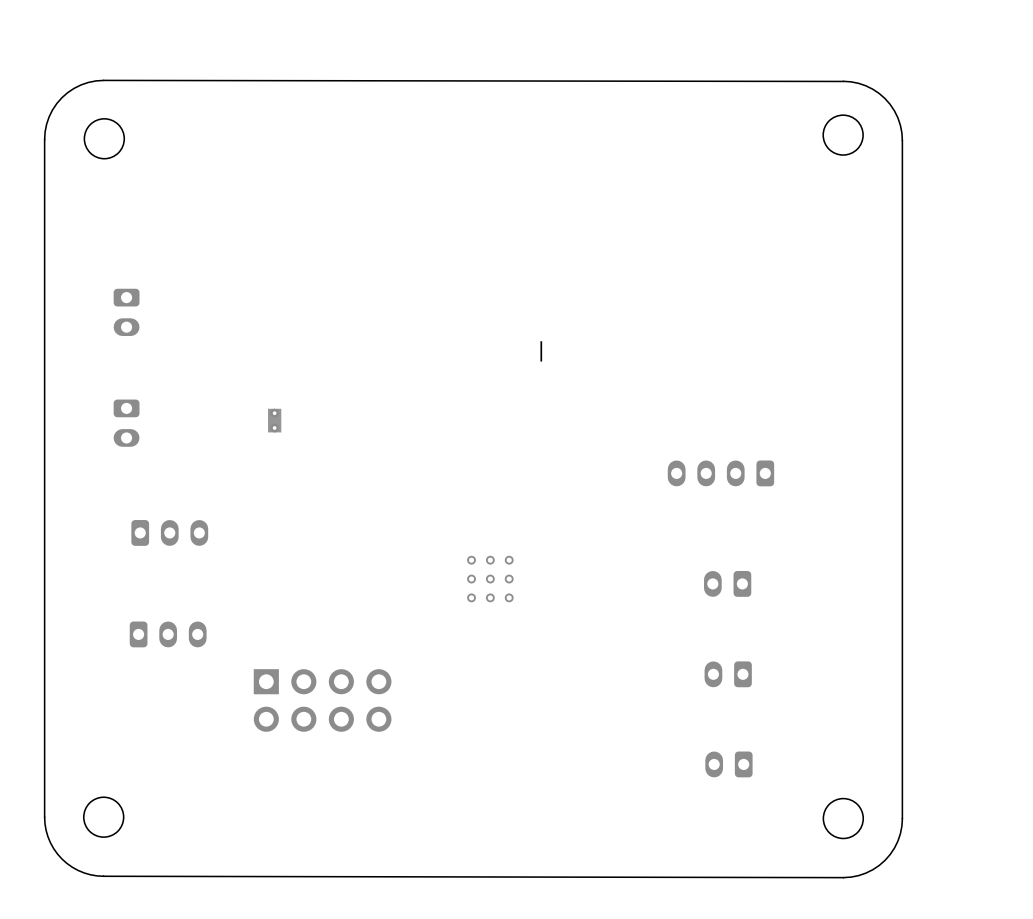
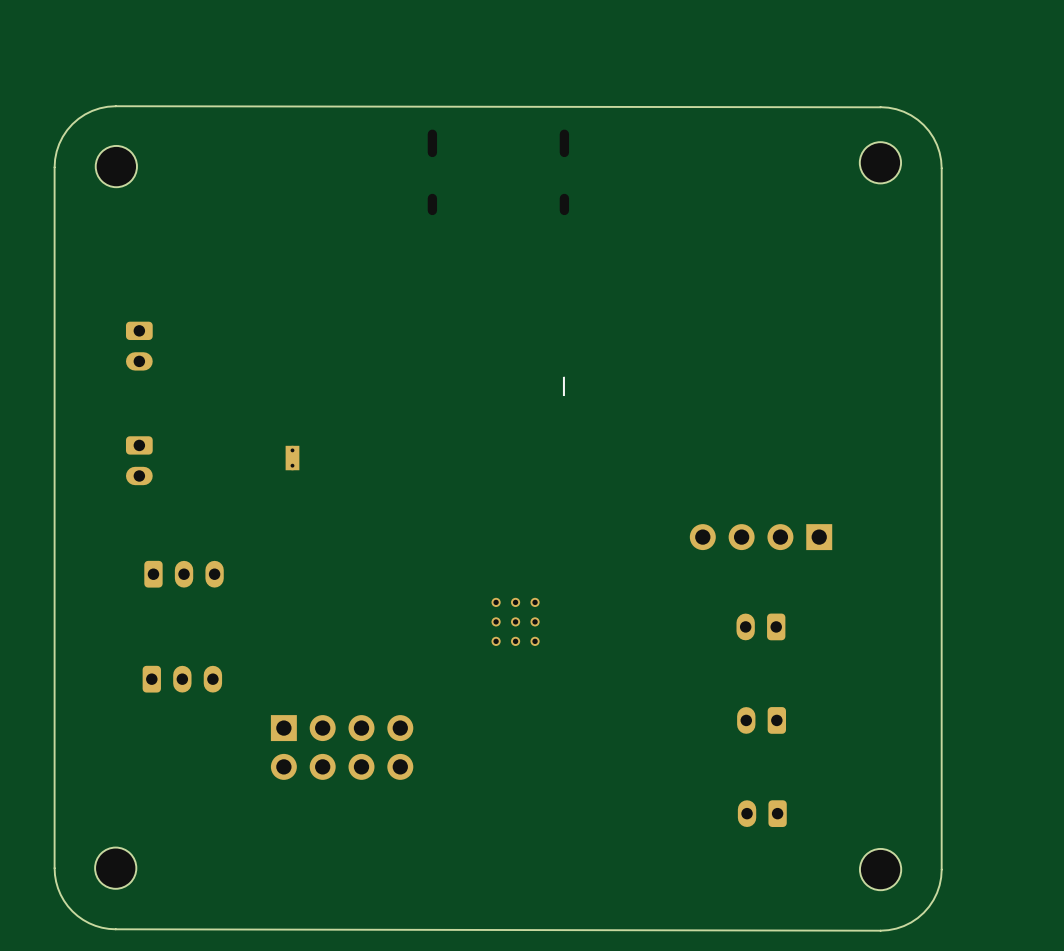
part: (720, 473) -> none
part: none -> (761, 537)

